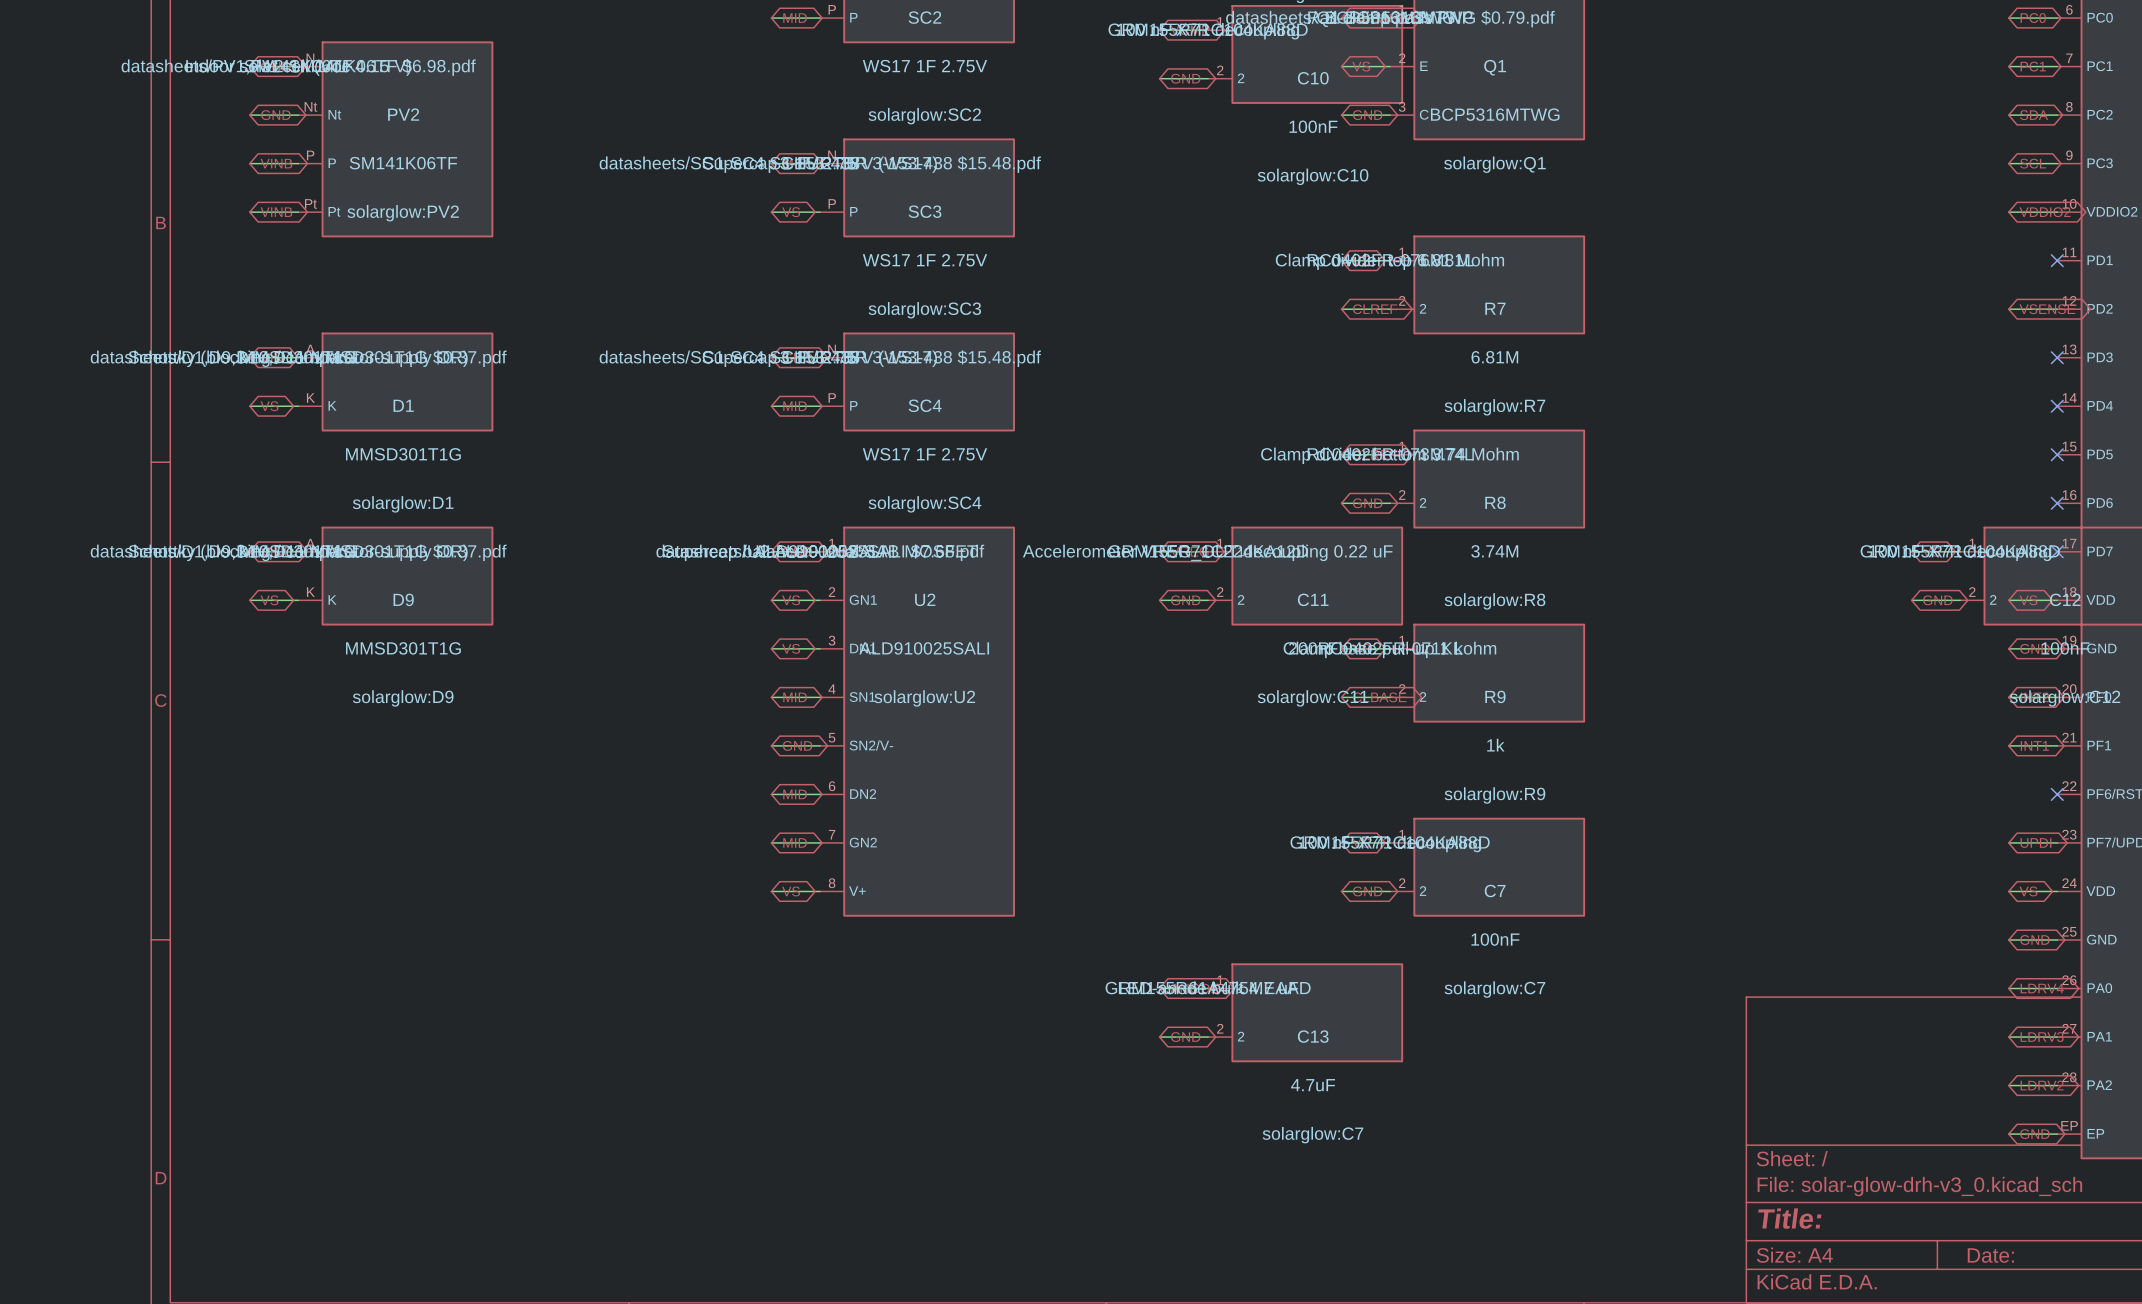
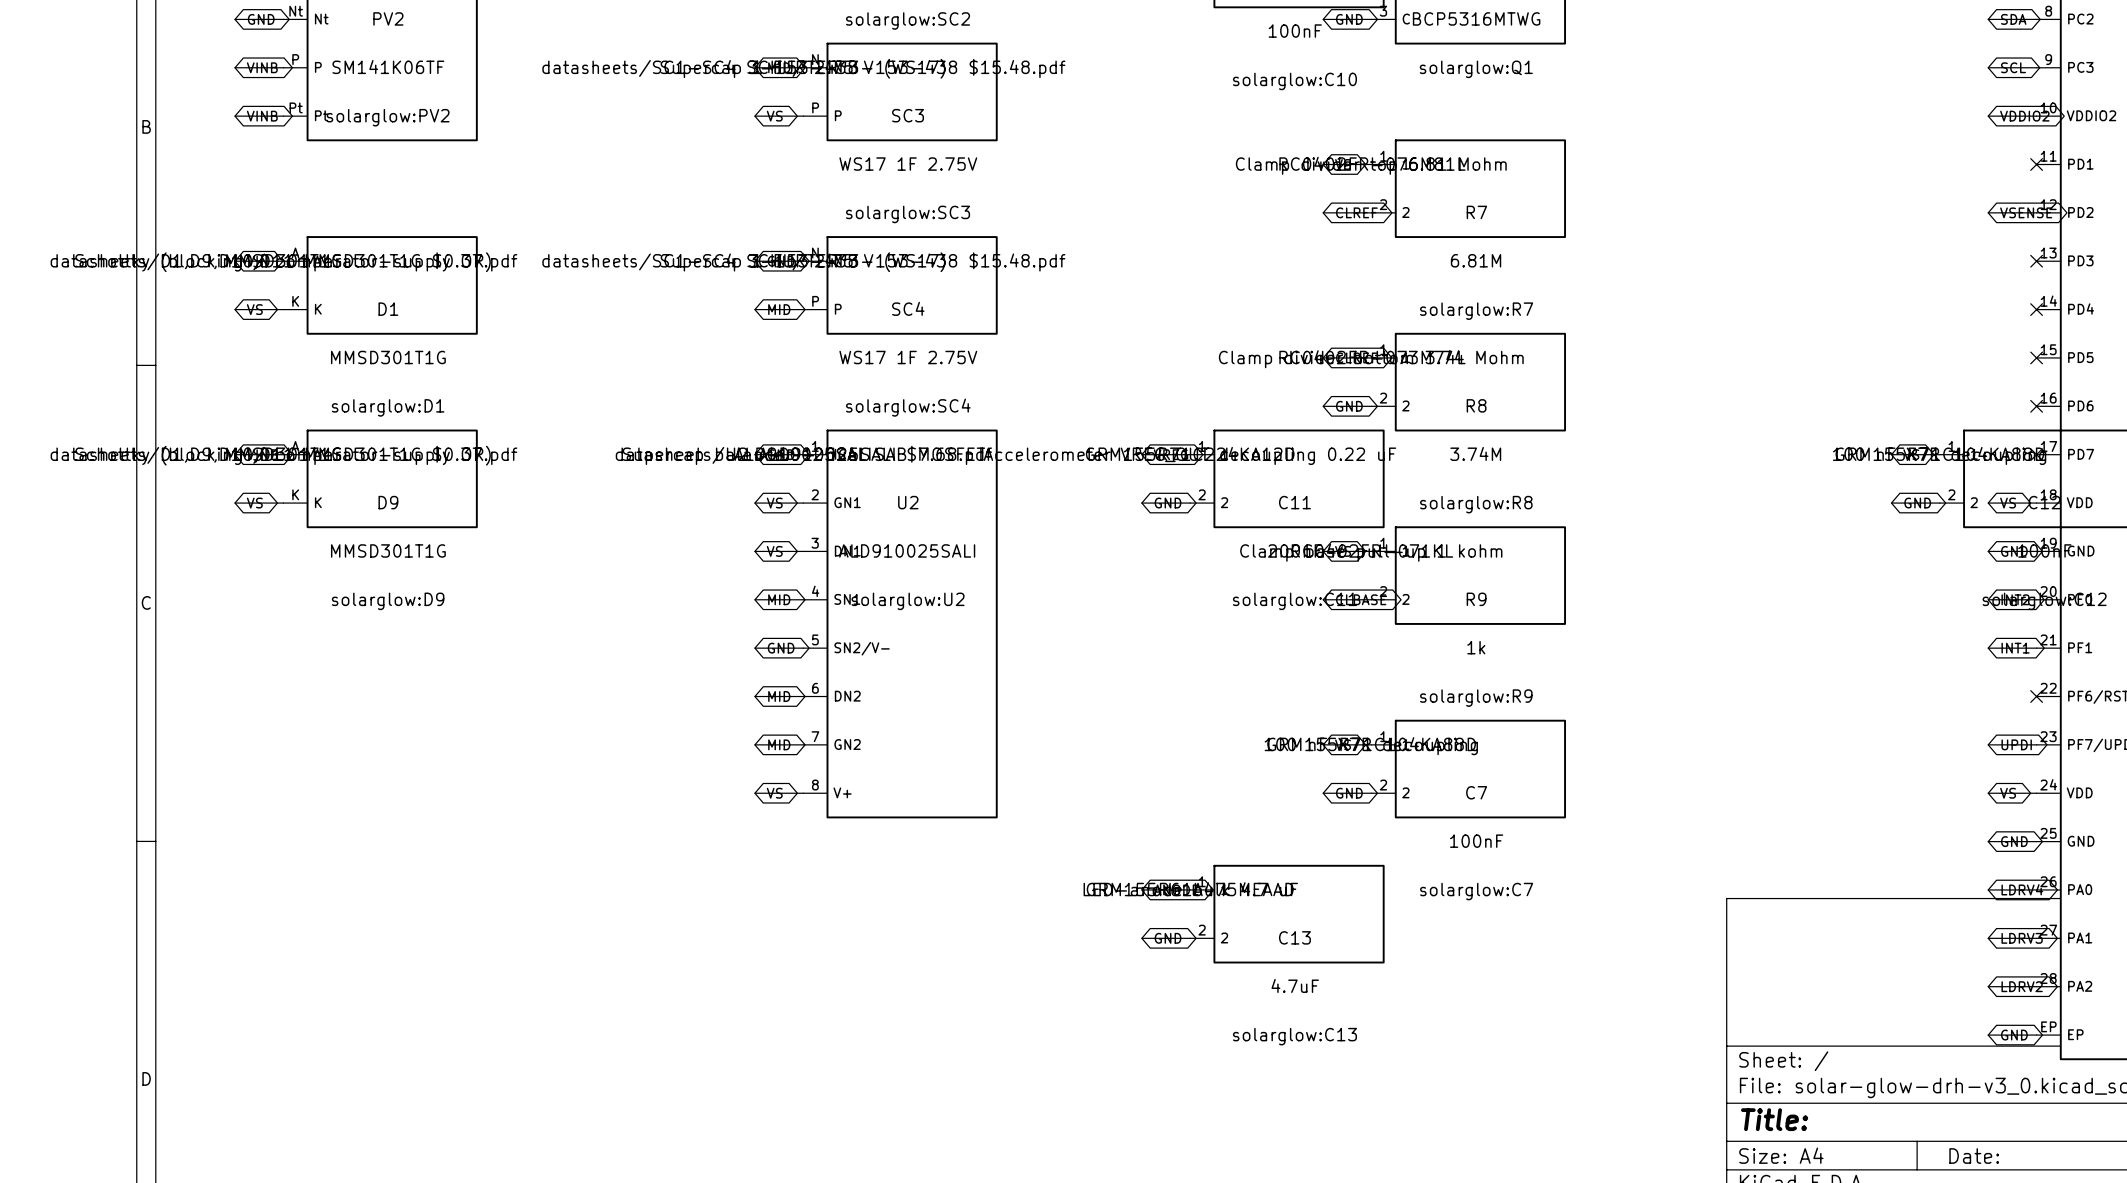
C13 text: solarglow:C7 (1312, 1135) -> solarglow:C13 (1294, 1036)

